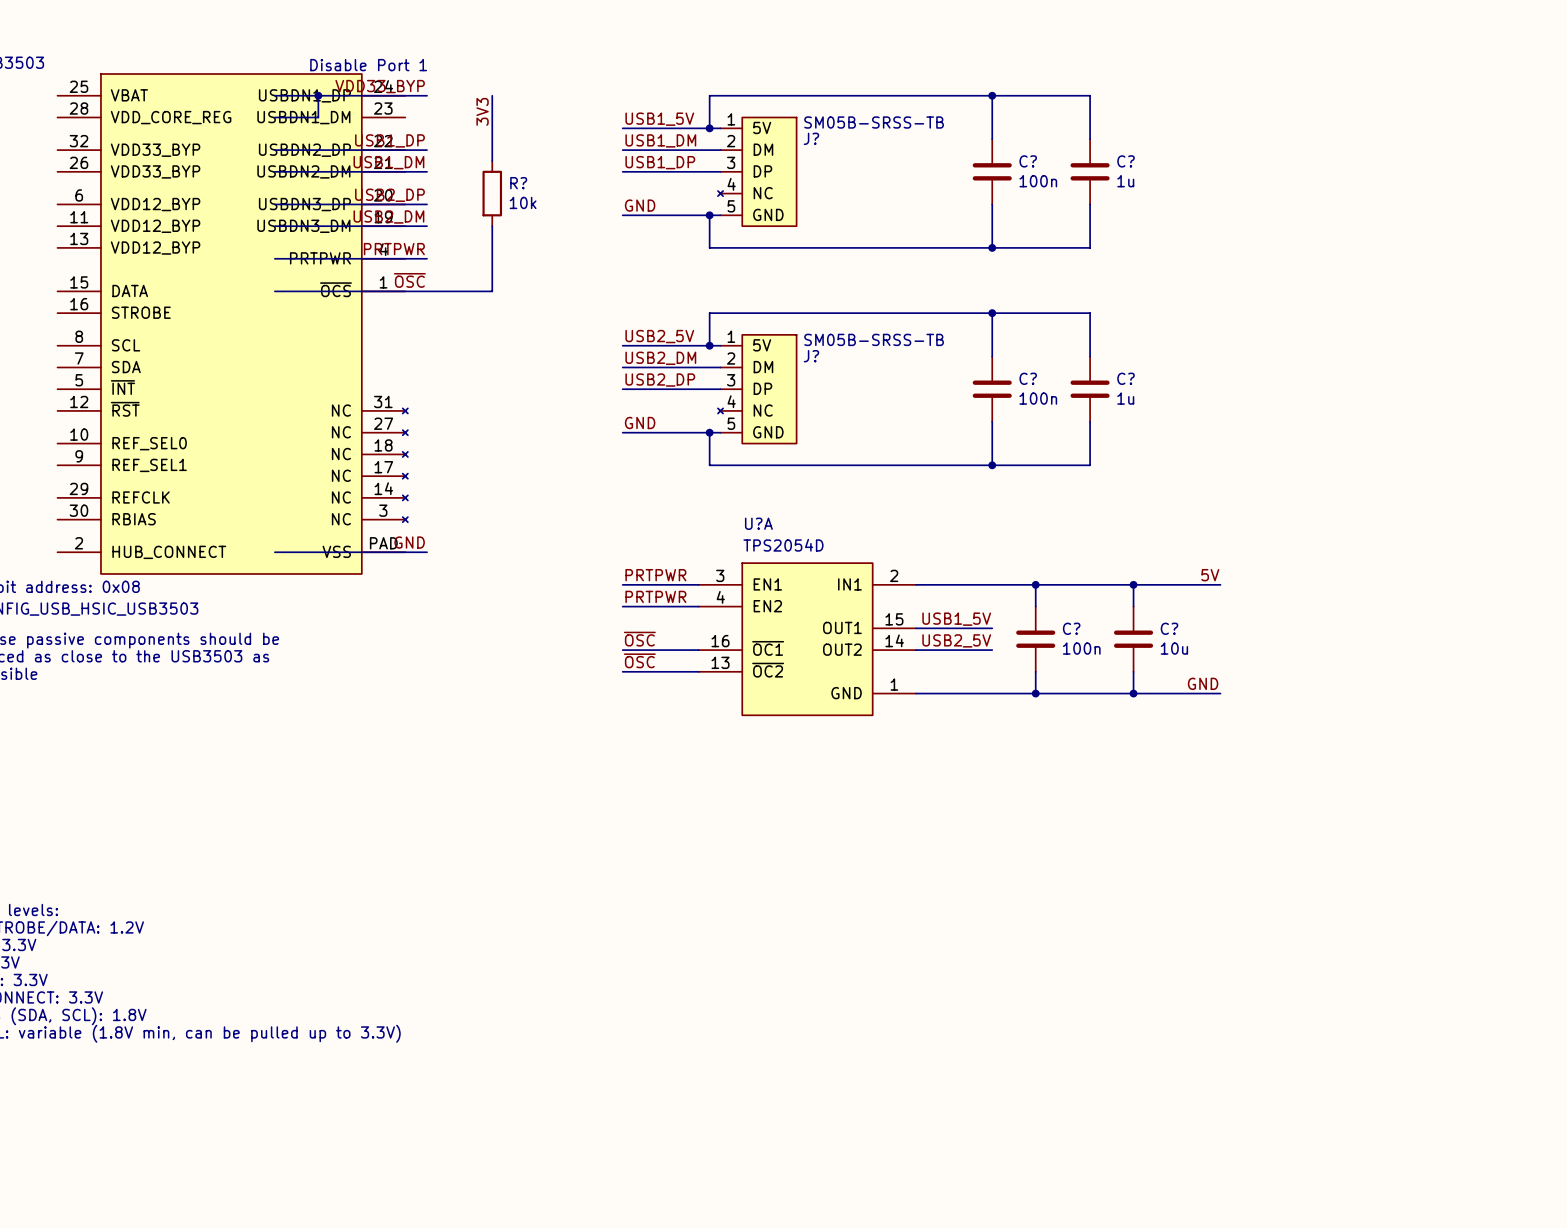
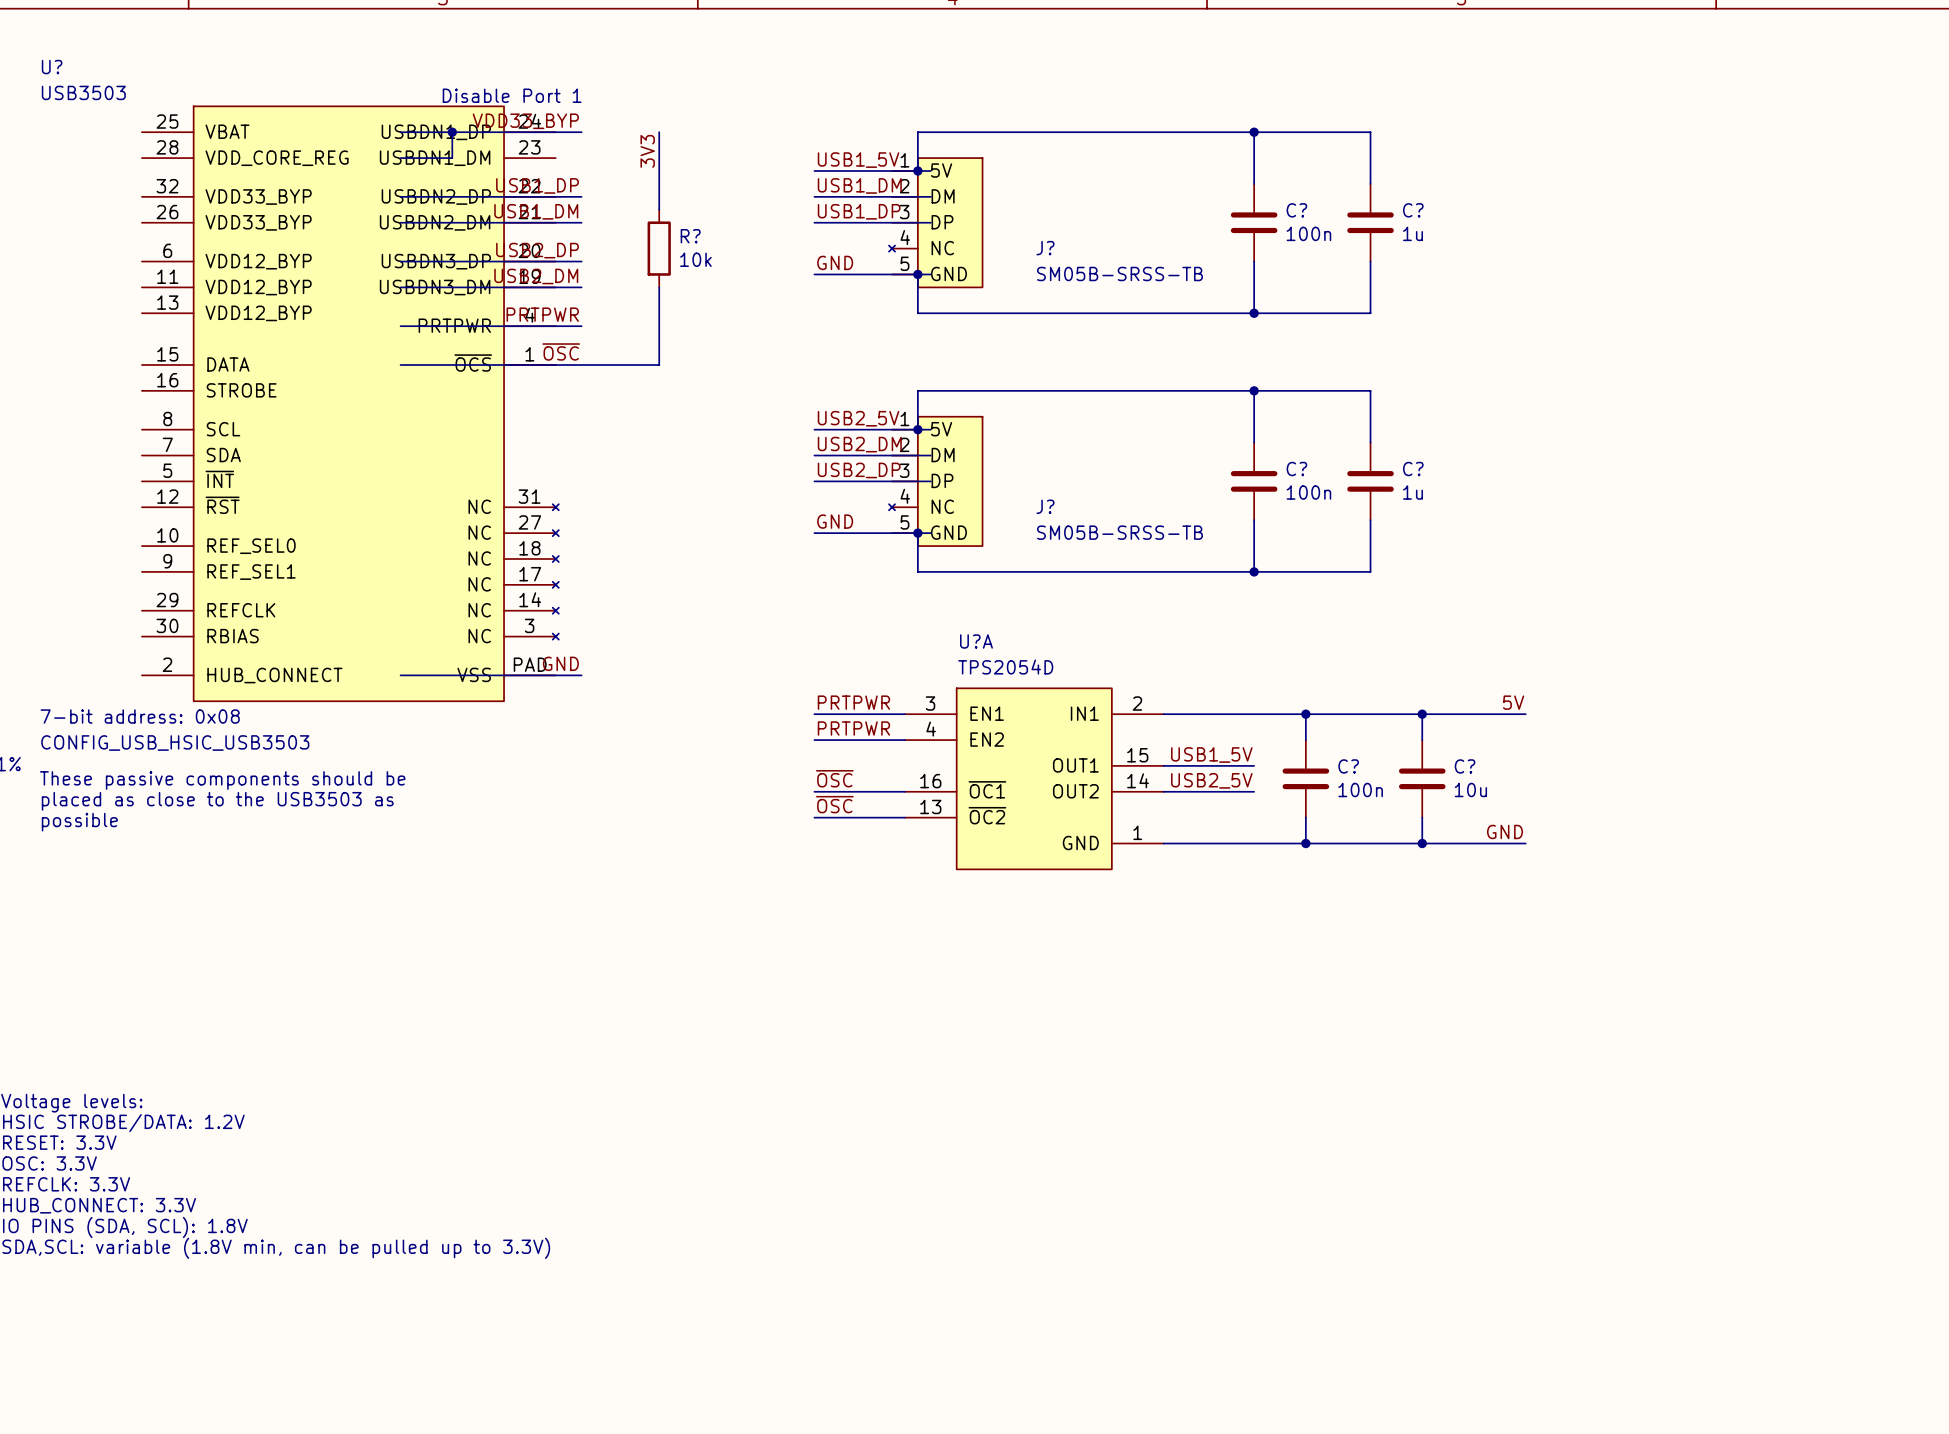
J? value position: SM05B-SRSS-TB (874, 122) -> SM05B-SRSS-TB (1119, 273)
J? name position: J? (811, 138) -> J? (1045, 248)
J? position: (757, 171) -> (935, 222)
J? value position: SM05B-SRSS-TB (874, 339) -> SM05B-SRSS-TB (1119, 532)
J? name position: J? (811, 356) -> J? (1045, 506)
J? position: (757, 389) -> (935, 481)

